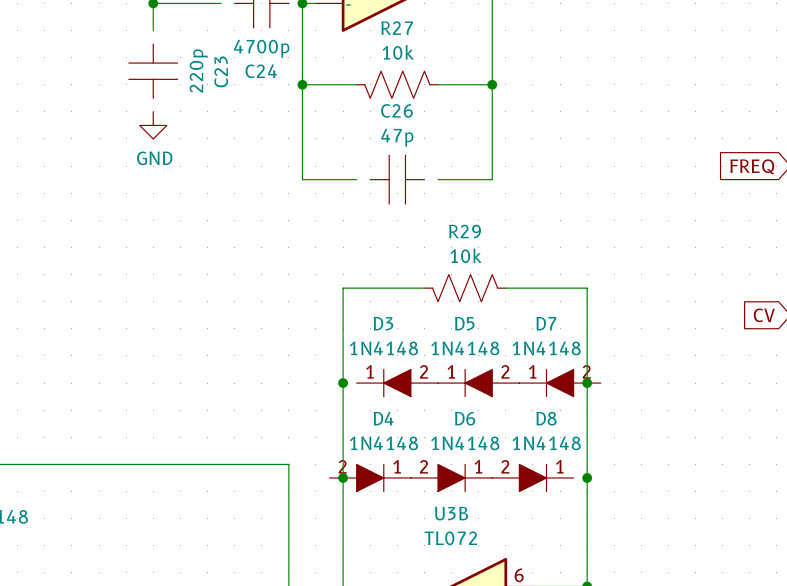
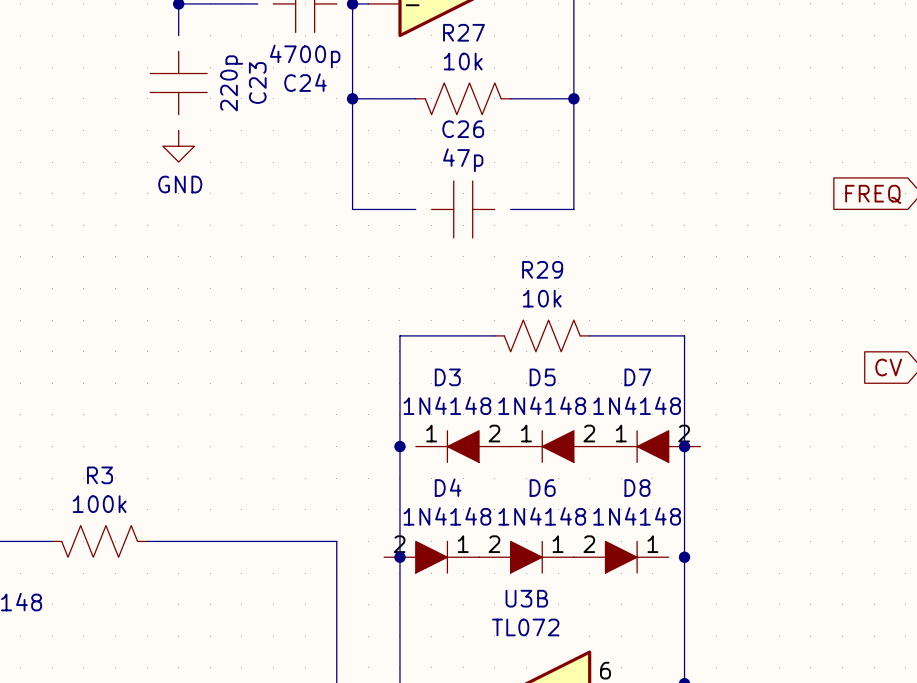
wire: (44, 464) (126, 464) -> none
R3: none -> 100k (99, 541)

